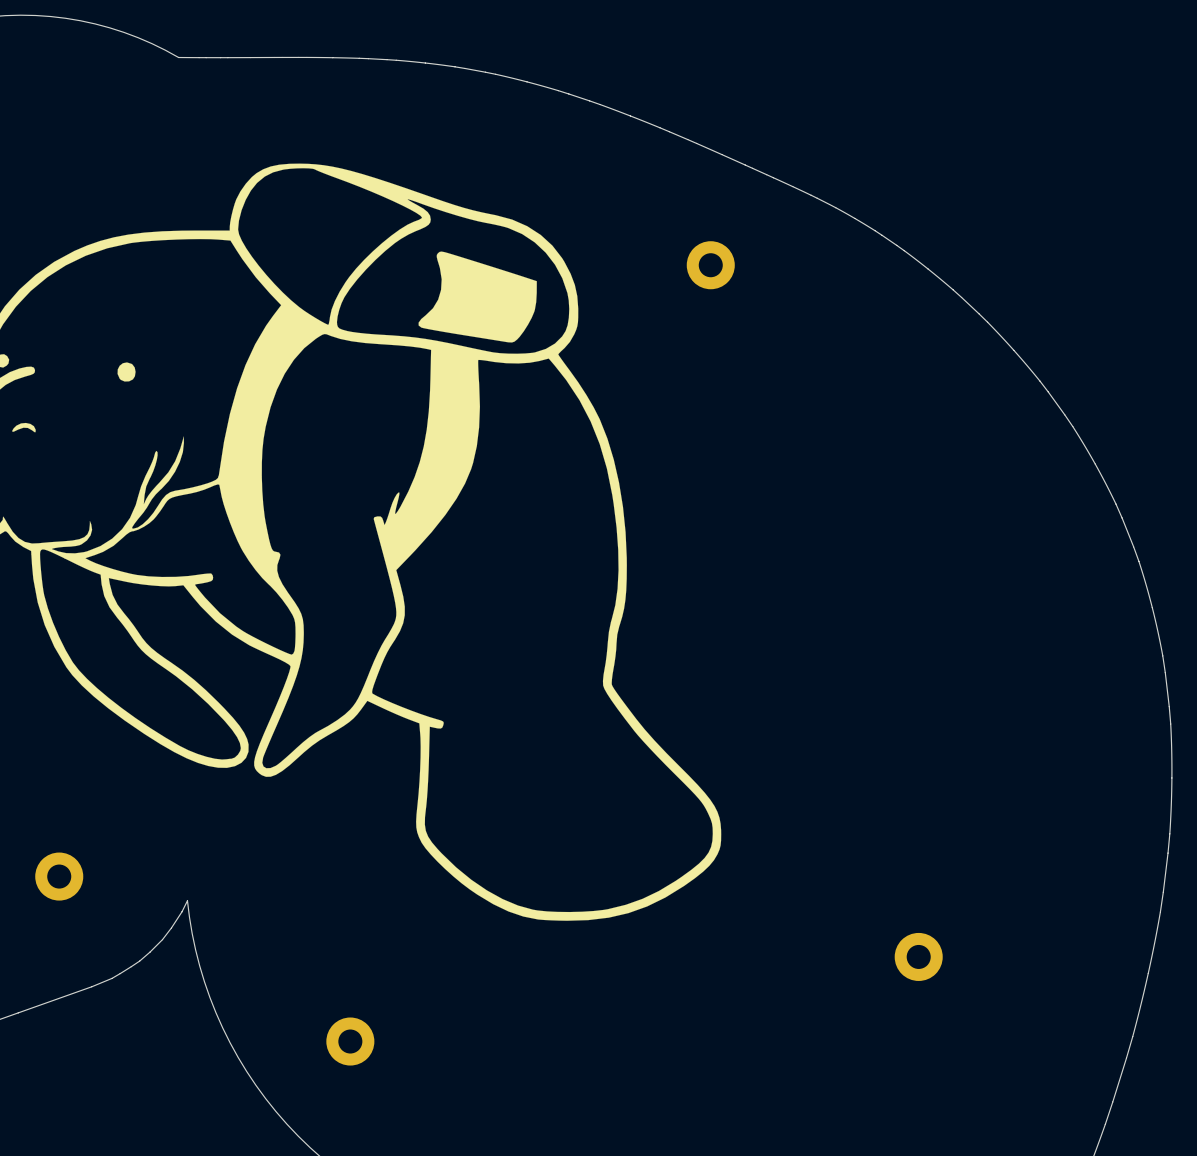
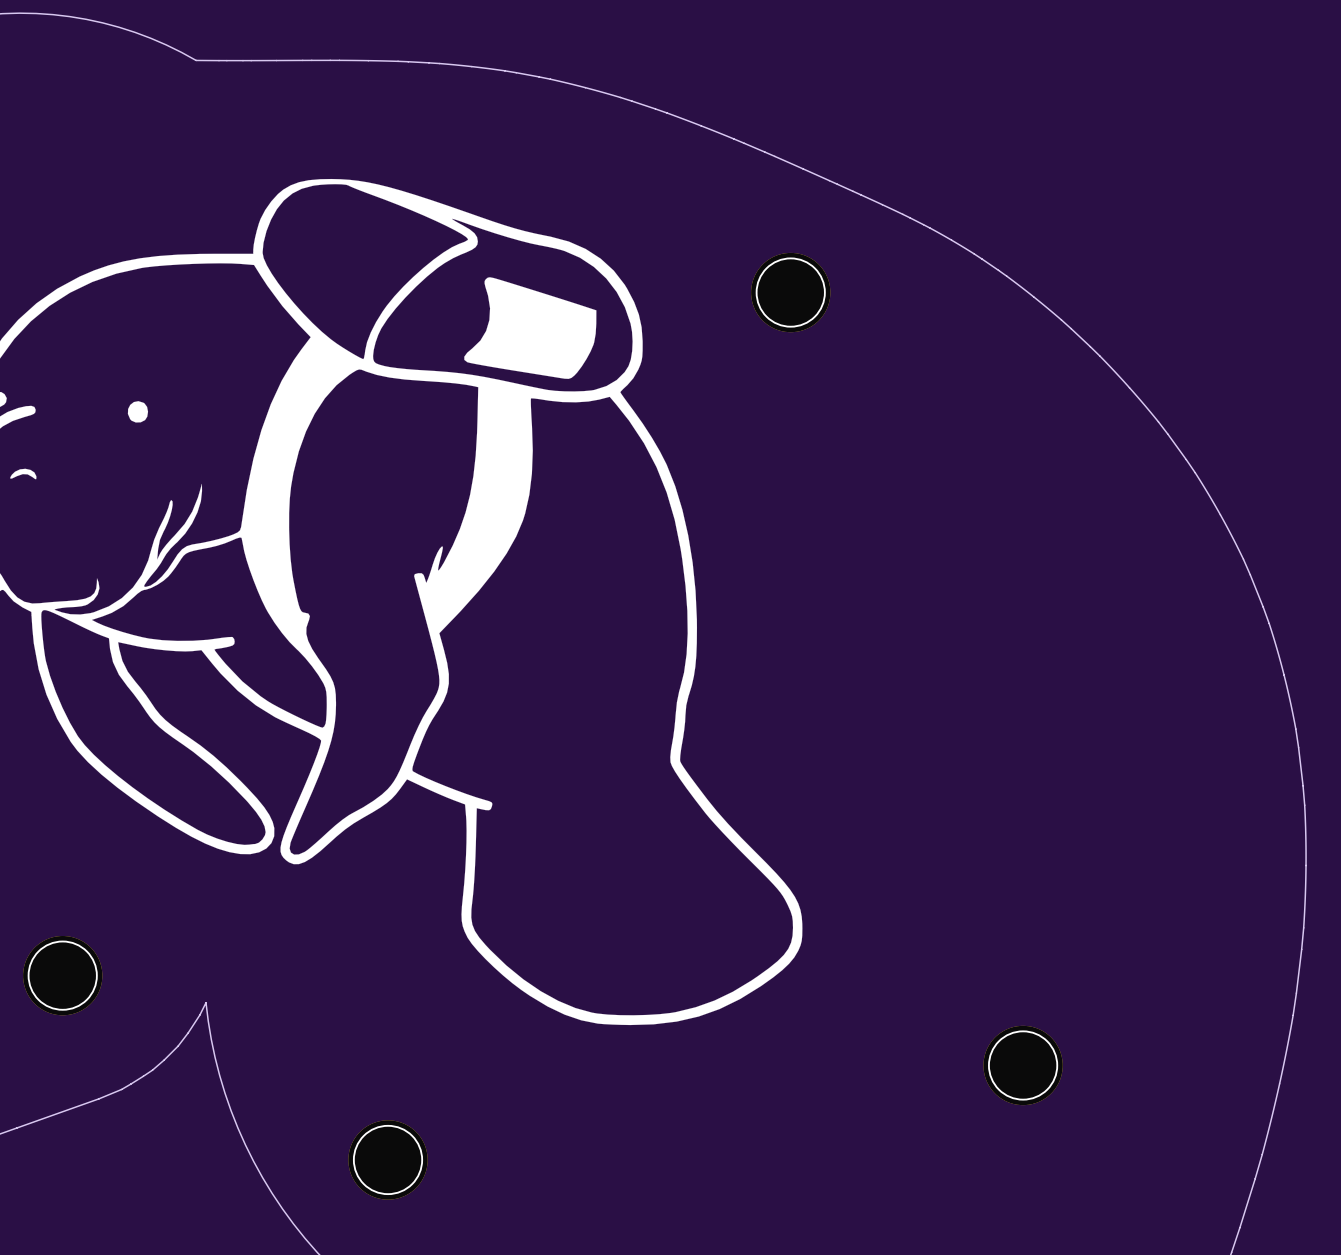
part footprint: [686, 241, 735, 290] -> [751, 252, 831, 333]
part footprint: [35, 852, 84, 901] -> [23, 936, 103, 1016]
part footprint: [894, 932, 943, 981] -> [983, 1025, 1063, 1106]
part footprint: [326, 1017, 375, 1066] -> [348, 1120, 428, 1200]

